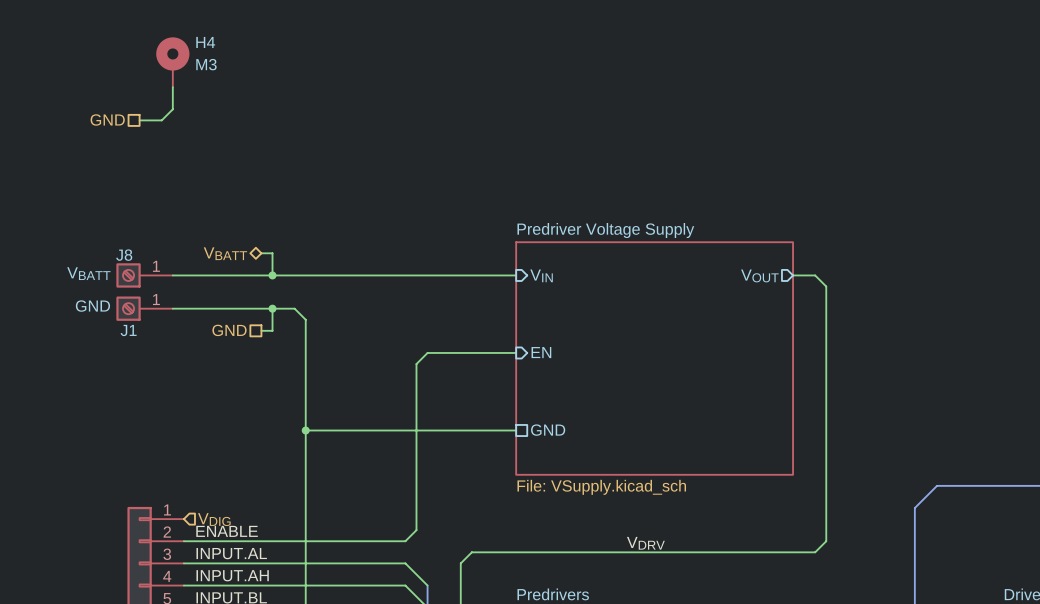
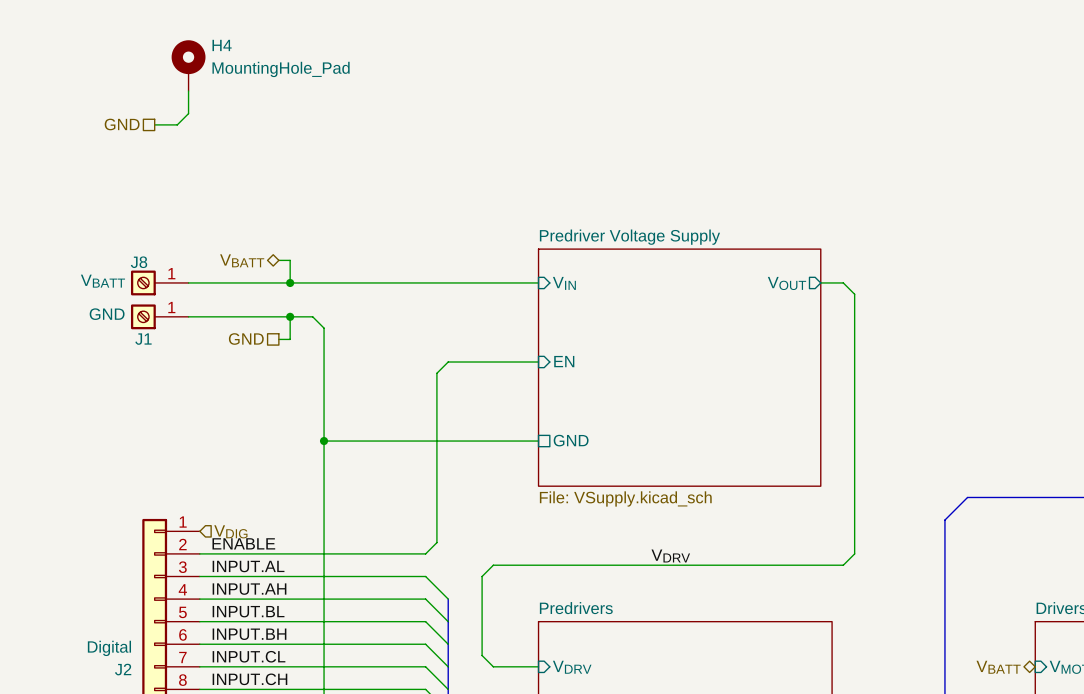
H4 value: M3 (206, 64) -> MountingHole_Pad (281, 69)

